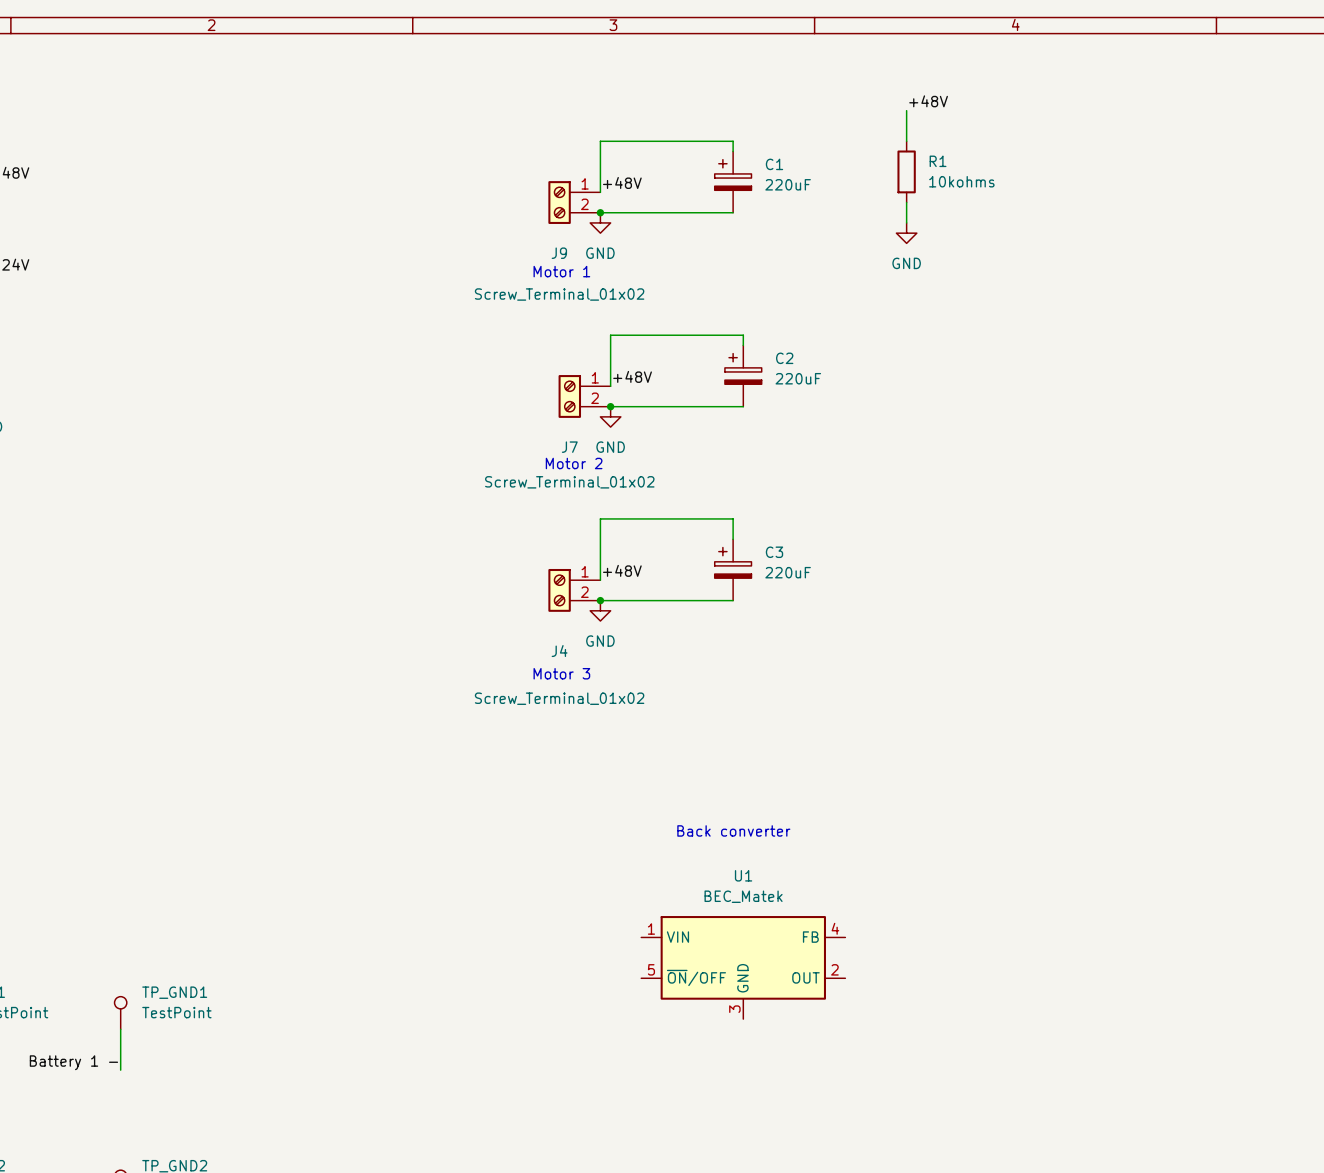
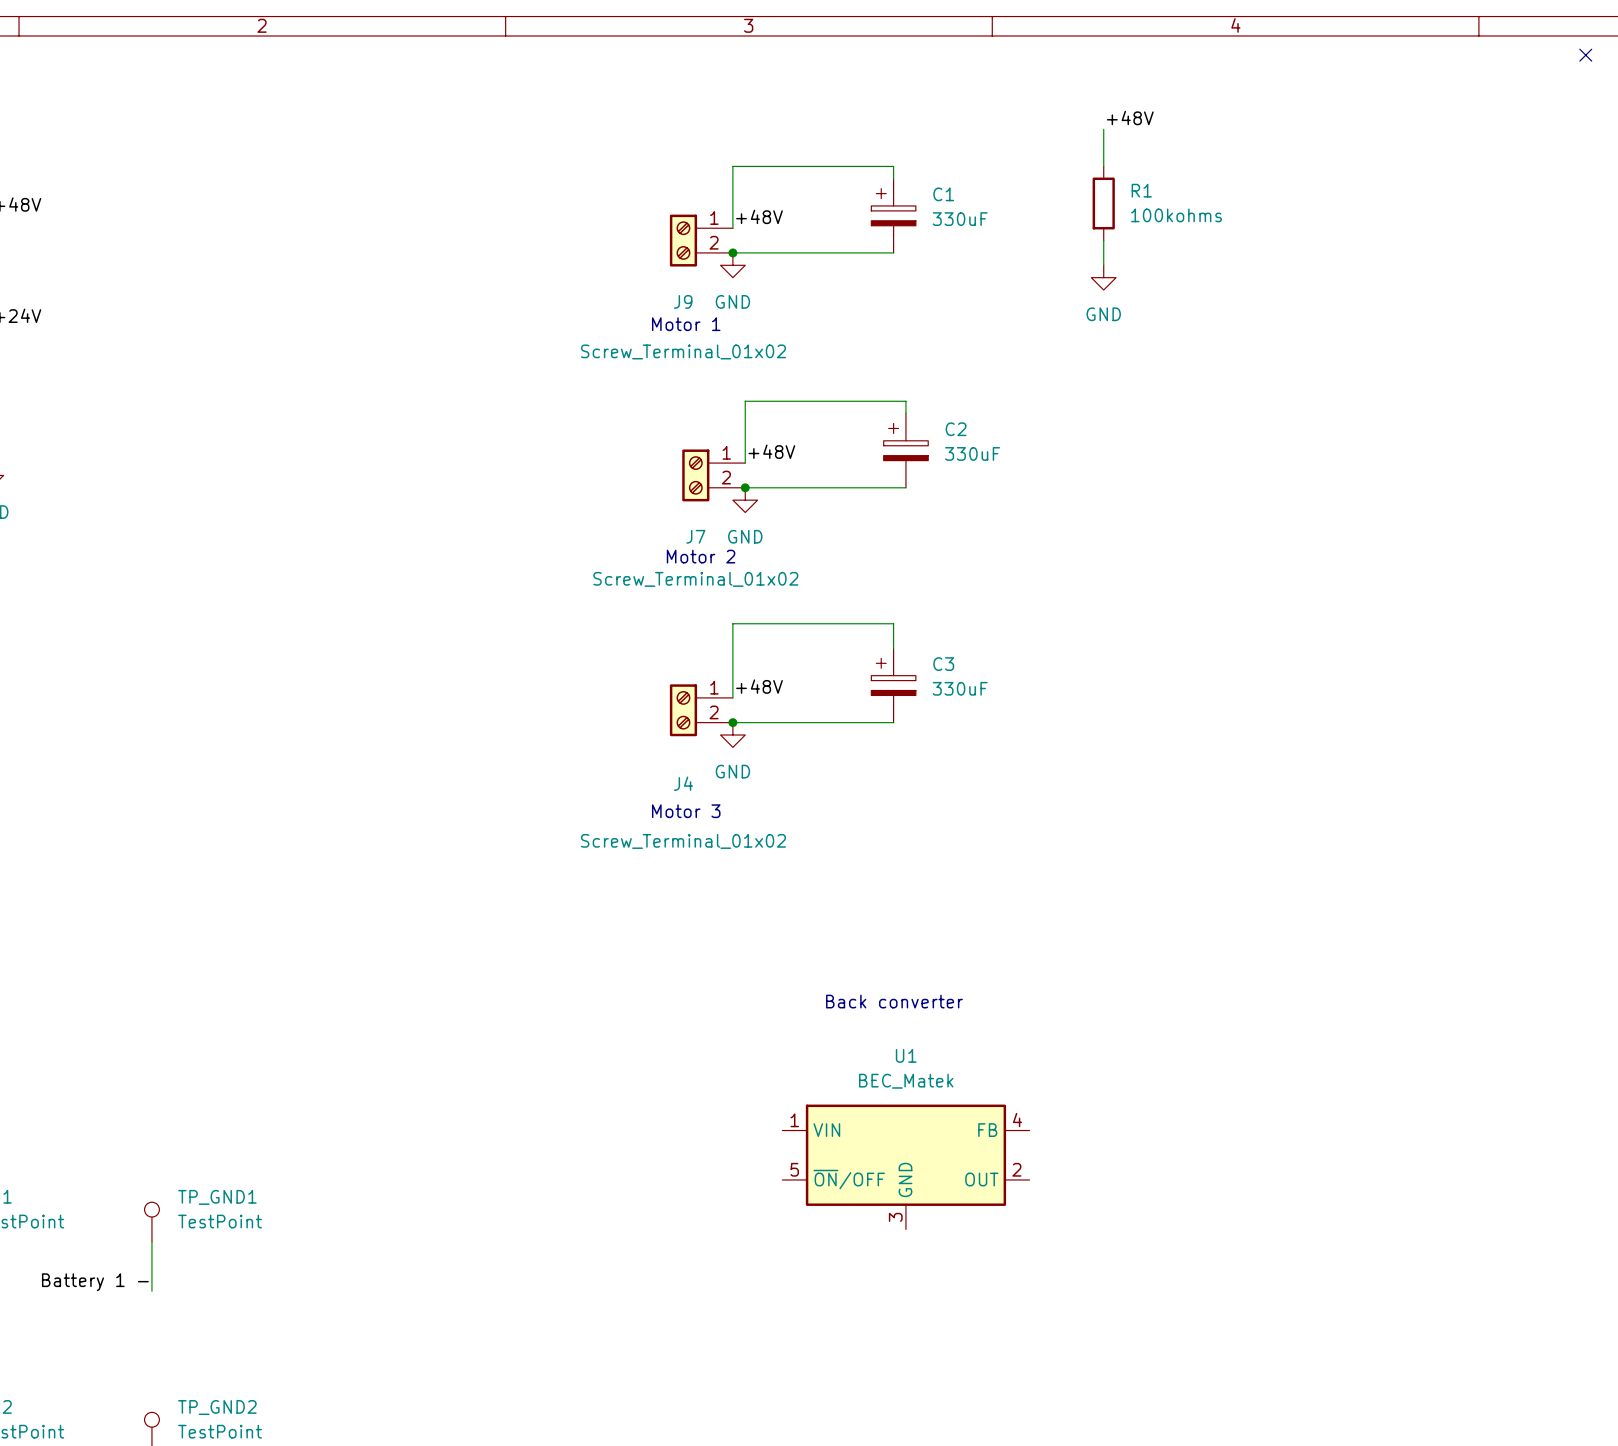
no-connect mark: none -> (1585, 55)
R1 value: 10kohms (961, 181) -> 100kohms (1176, 215)
C1 value: 220uF (788, 184) -> 330uF (960, 219)
C2 value: 220uF (798, 378) -> 330uF (972, 453)
C3 value: 220uF (788, 572) -> 330uF (960, 688)

